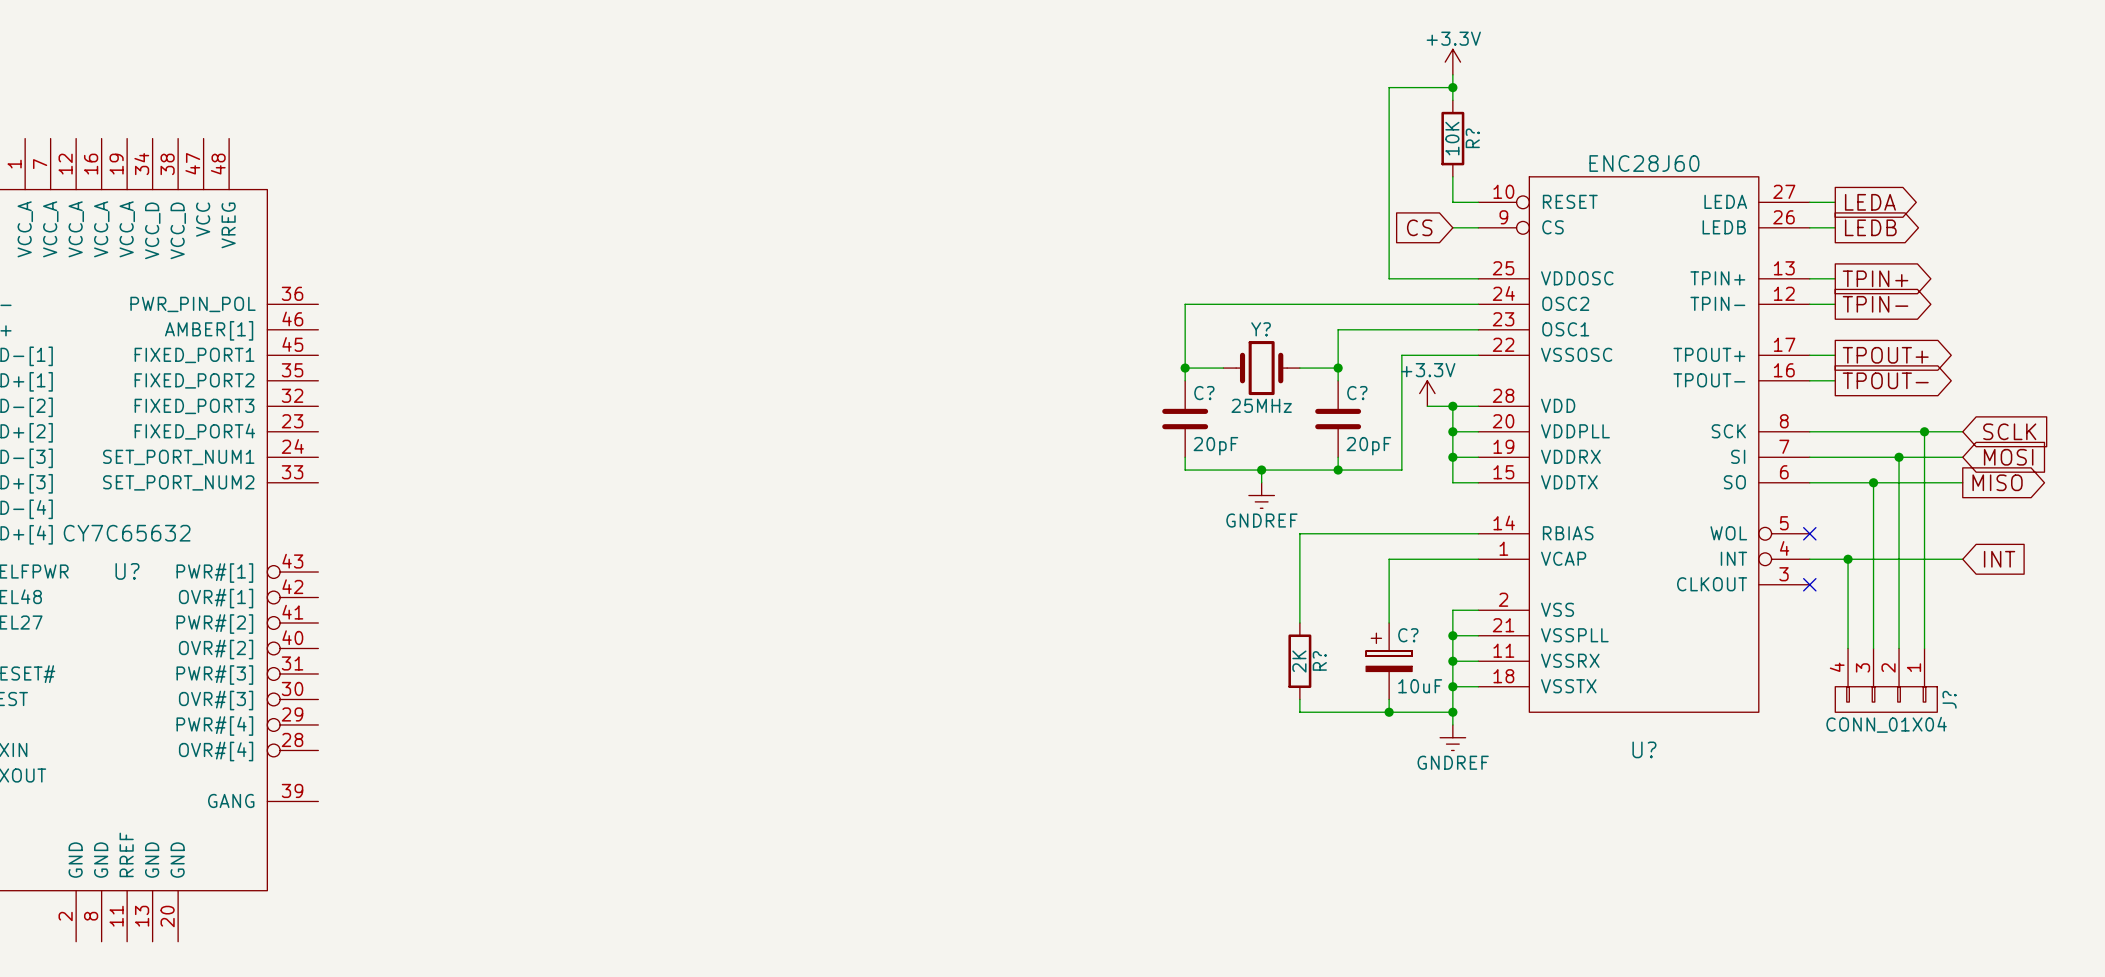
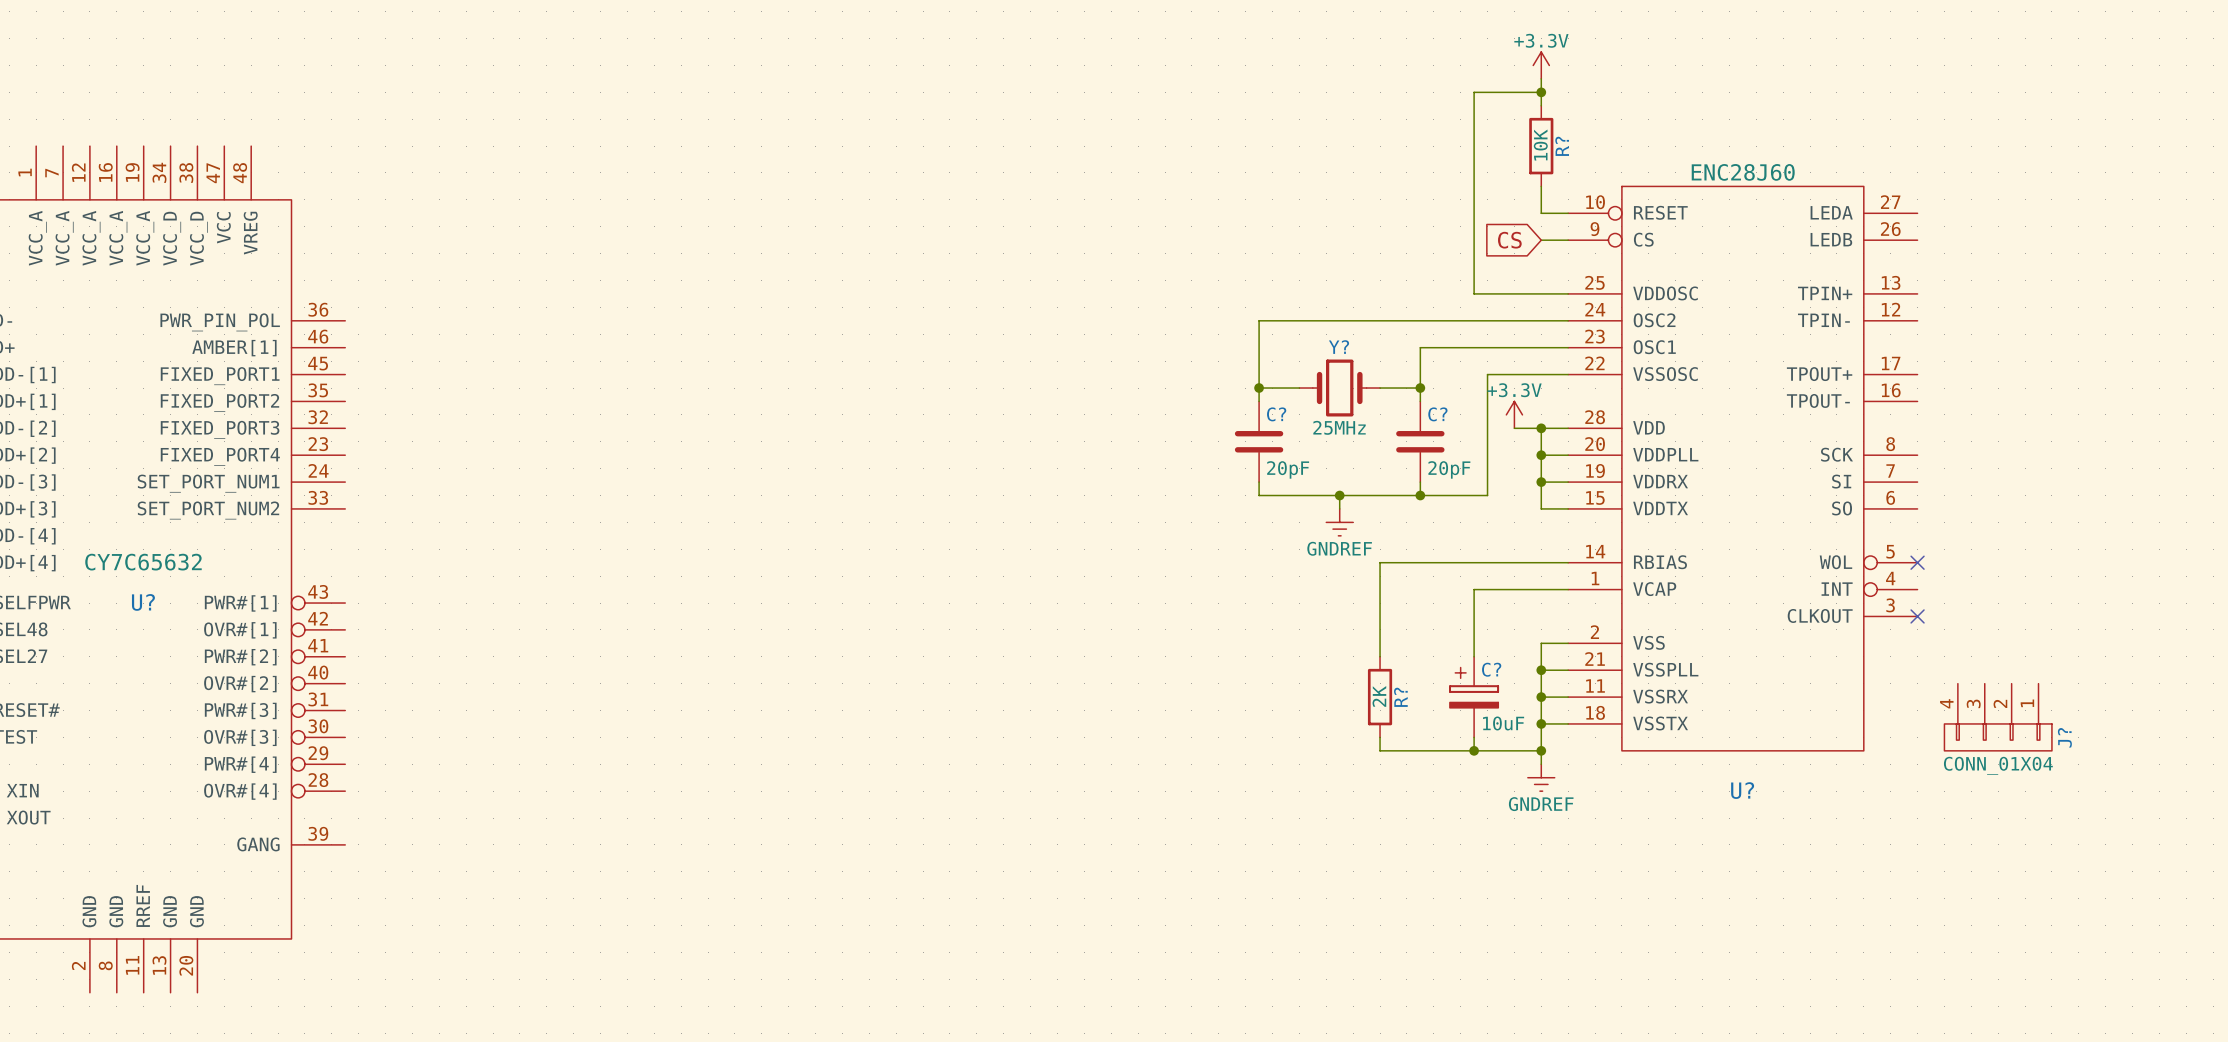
wire: (1809, 202) (1835, 202) -> none
global label: LEDA (1870, 202) -> none
wire: (1809, 227) (1835, 227) -> none
global label: LEDB (1870, 227) -> none
wire: (1809, 278) (1835, 278) -> none
global label: TPIN+ (1875, 278) -> none
wire: (1809, 304) (1835, 304) -> none
global label: TPIN- (1875, 304) -> none
wire: (1809, 355) (1835, 355) -> none
global label: TPOUT+ (1885, 355) -> none
wire: (1809, 380) (1835, 380) -> none
global label: TPOUT- (1885, 380) -> none
wire: (1809, 431) (1962, 431) -> none
wire: (1924, 431) (1924, 648) -> none
junction: (1924, 431) -> none
global label: SCLK (2009, 431) -> none
wire: (1809, 457) (1962, 457) -> none
wire: (1899, 457) (1899, 648) -> none
junction: (1899, 457) -> none
global label: MOSI (2008, 457) -> none
wire: (1809, 482) (1962, 482) -> none
wire: (1873, 482) (1873, 648) -> none
junction: (1873, 482) -> none
global label: MISO (1997, 482) -> none
wire: (1809, 559) (1962, 559) -> none
wire: (1848, 559) (1848, 648) -> none
junction: (1848, 559) -> none
global label: INT (1999, 559) -> none

